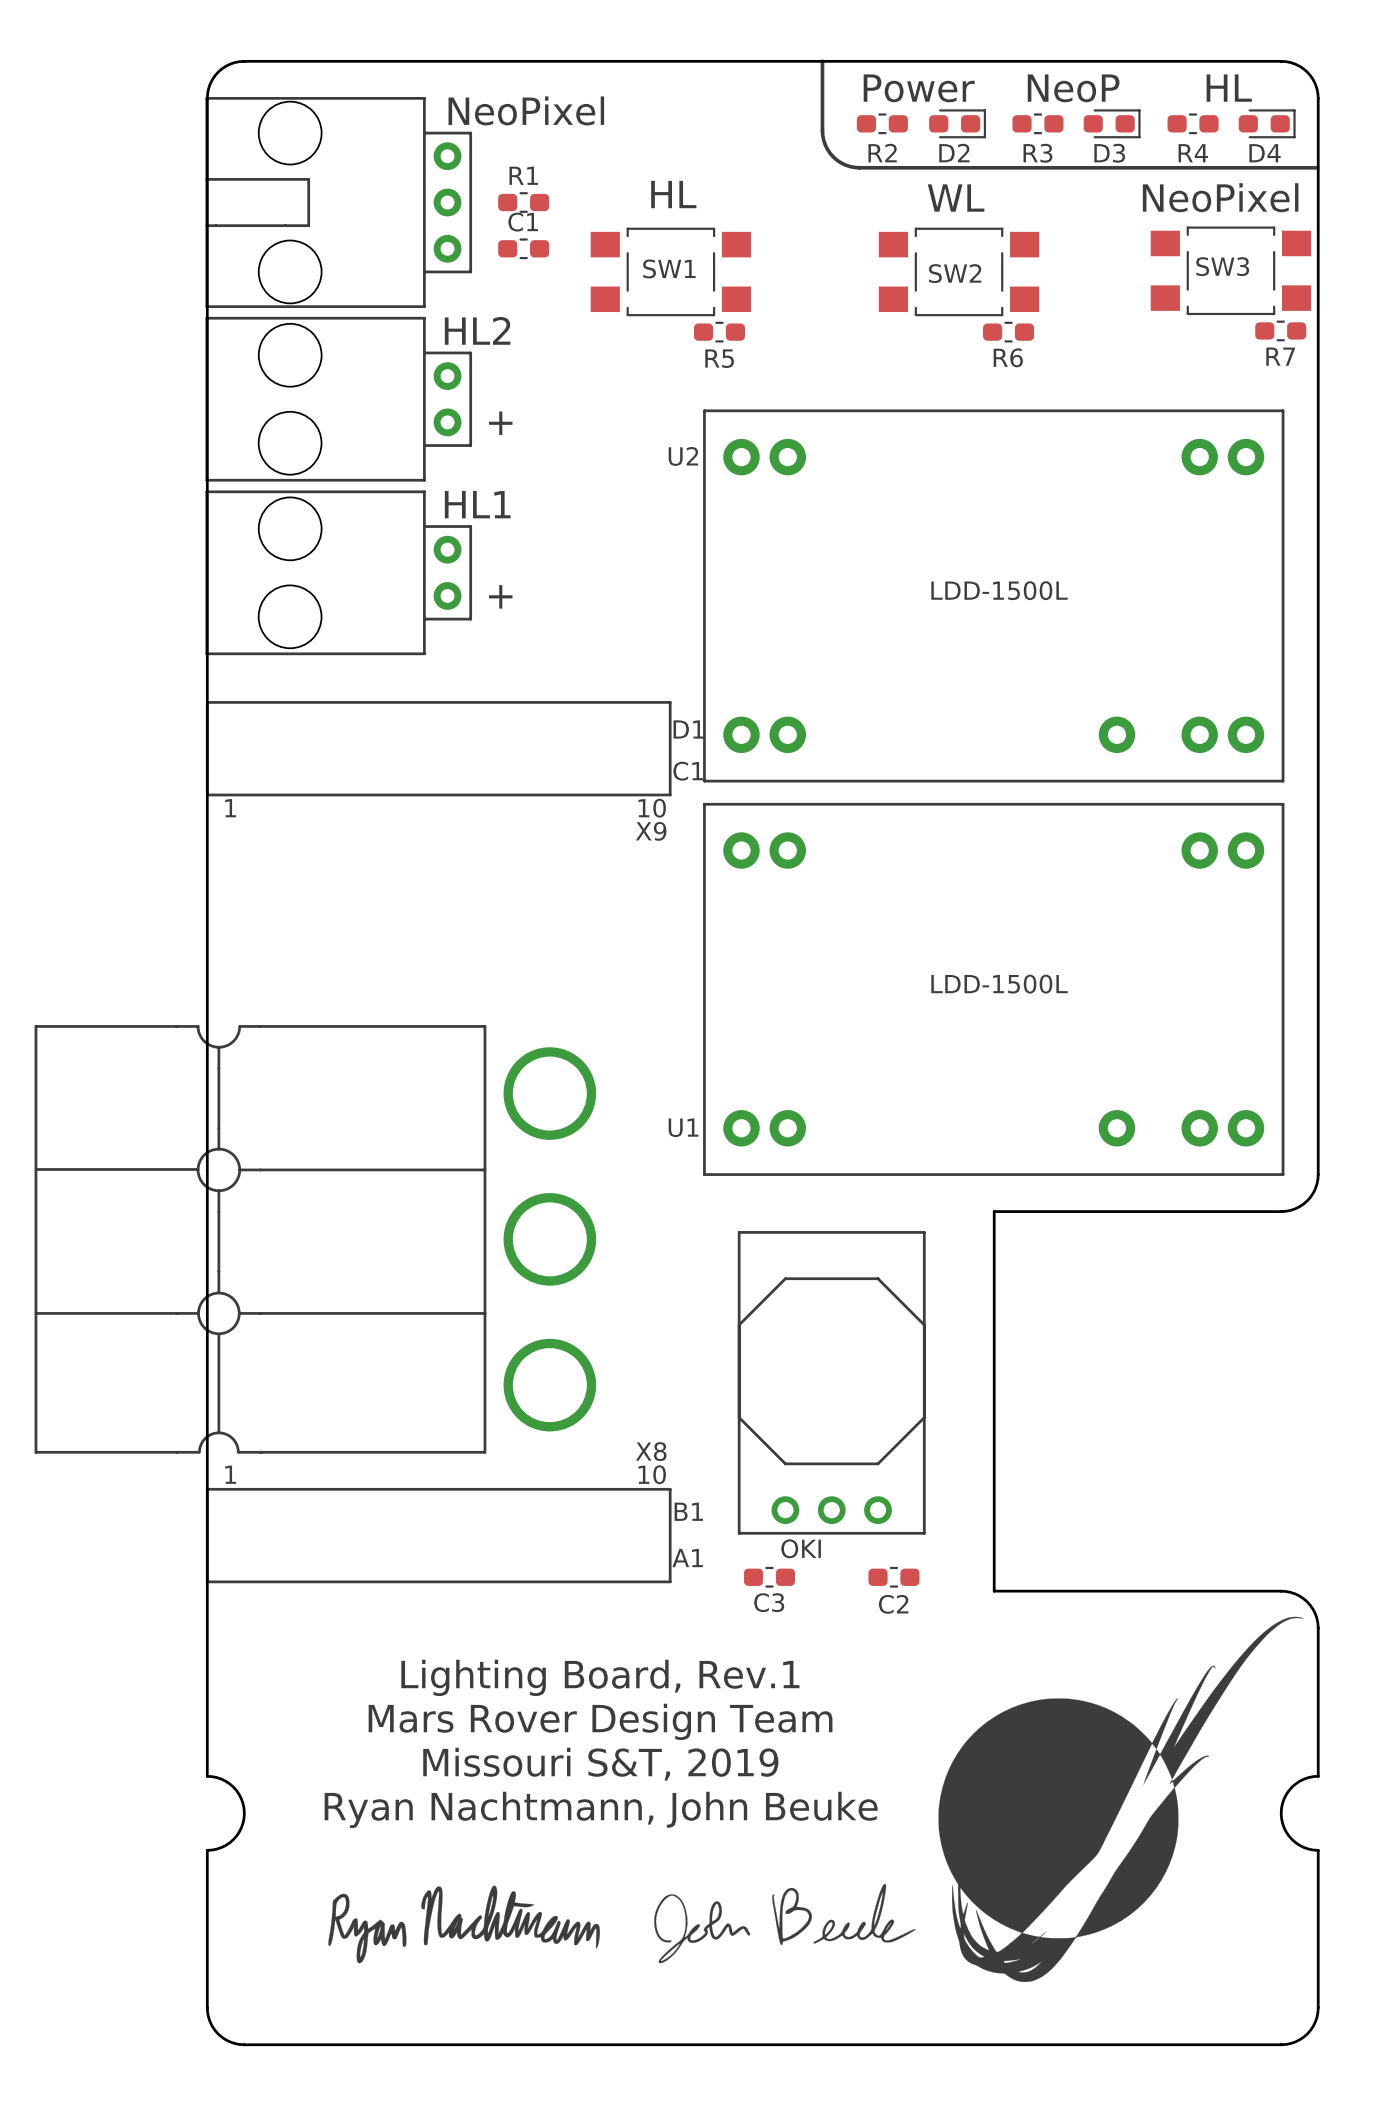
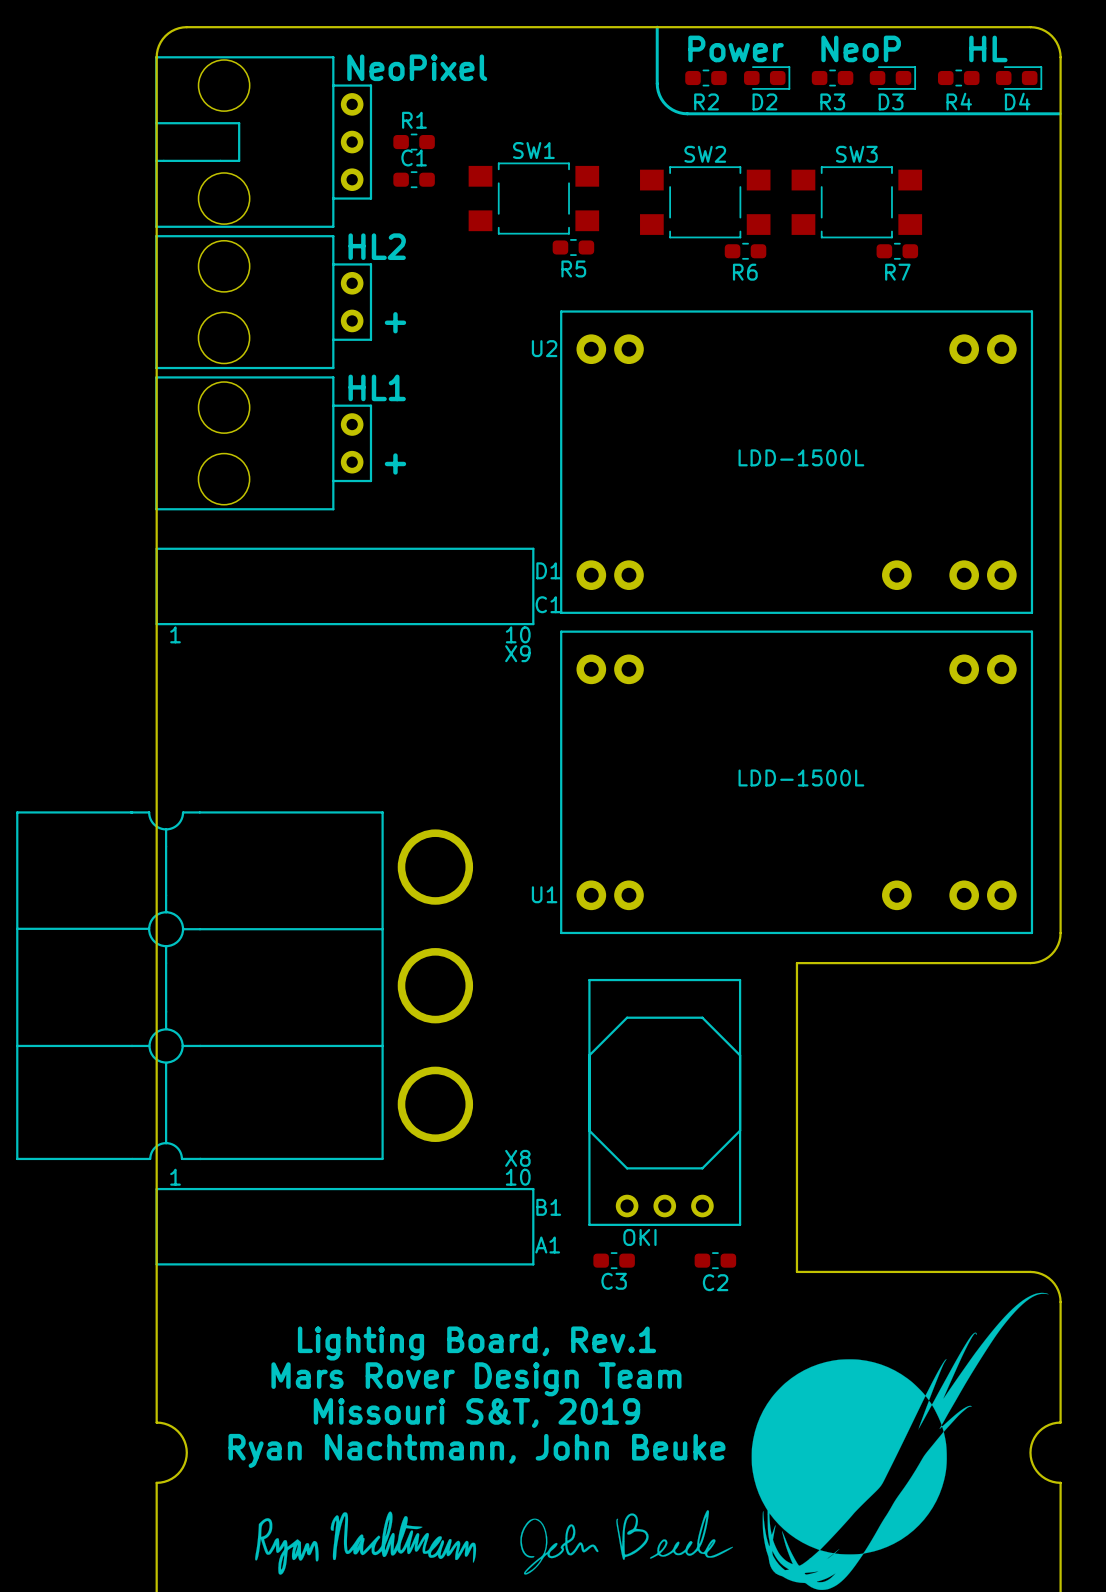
text: HL (673, 194) -> none
text: NeoPixel (1220, 197) -> none
text: WL (956, 198) -> none
SW3 name position: SW3 (1222, 266) -> SW3 (856, 154)
SW1 name position: SW1 (669, 268) -> SW1 (533, 150)
SW3 position: (1230, 270) -> (856, 202)
SW2 position: (959, 271) -> (705, 202)
SW2 name position: SW2 (955, 273) -> SW2 (705, 154)
R7 position: (1280, 330) -> (897, 251)
R6 position: (1008, 332) -> (745, 251)

